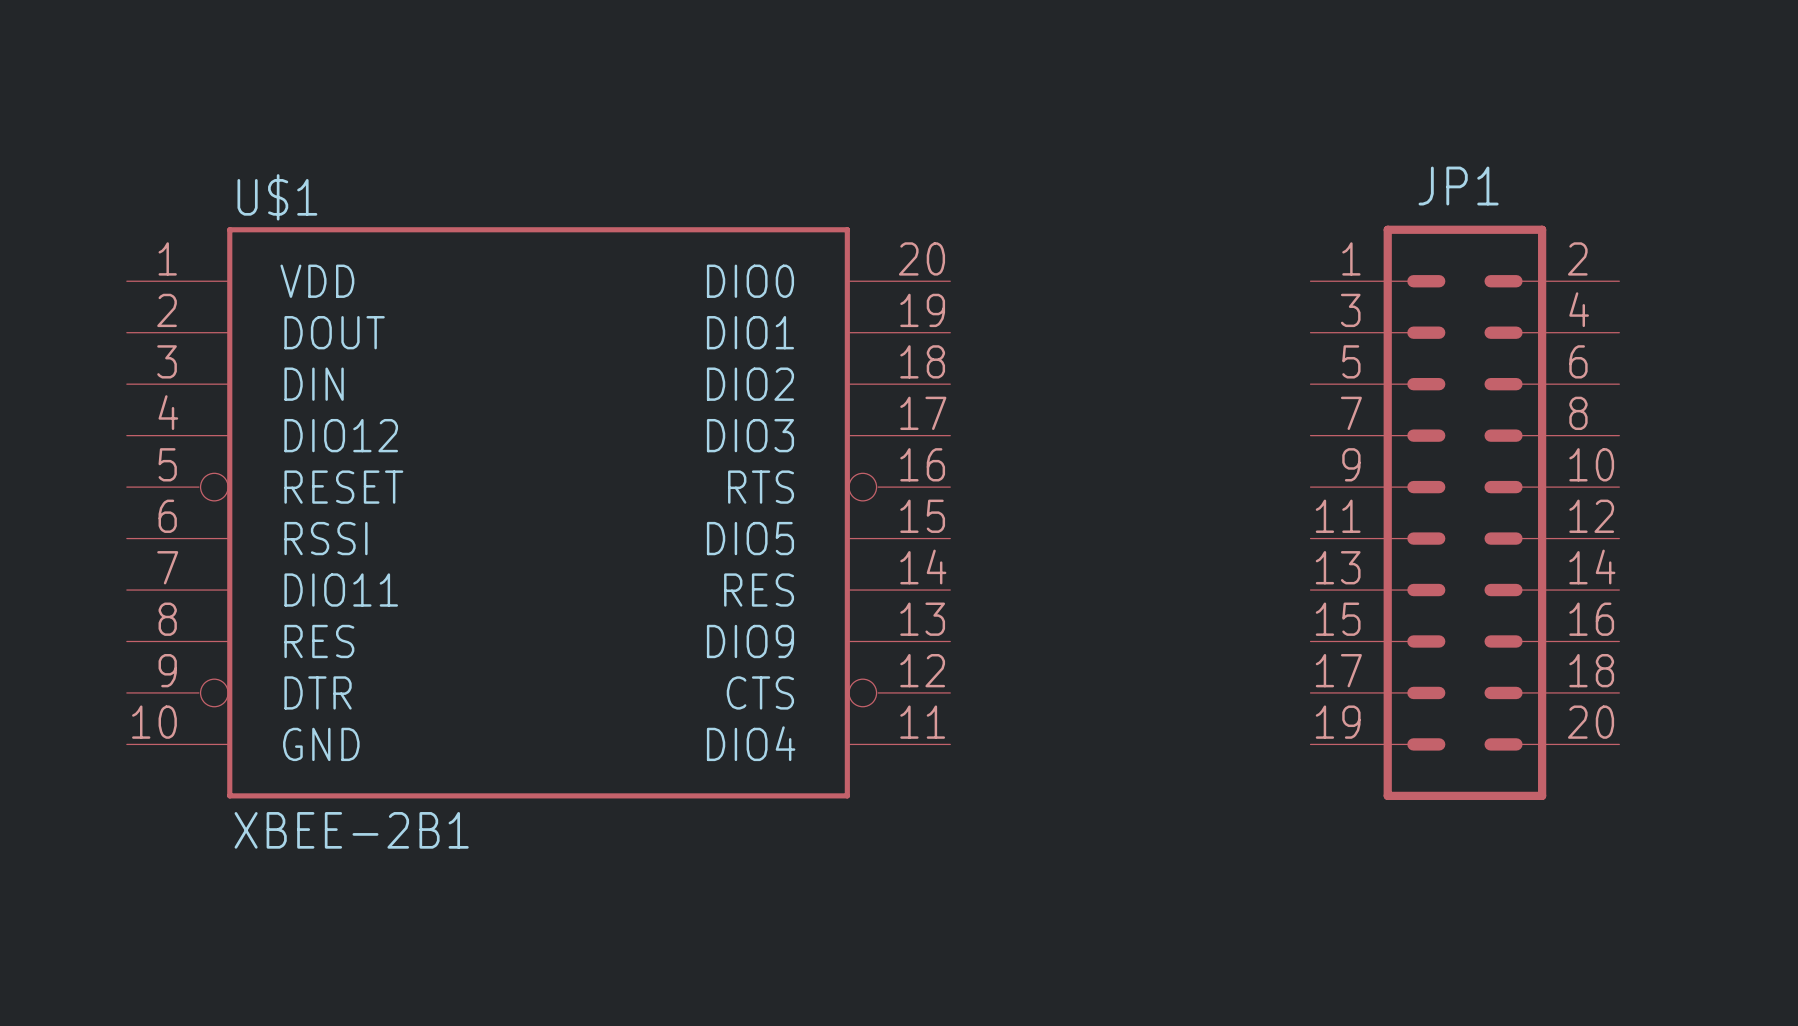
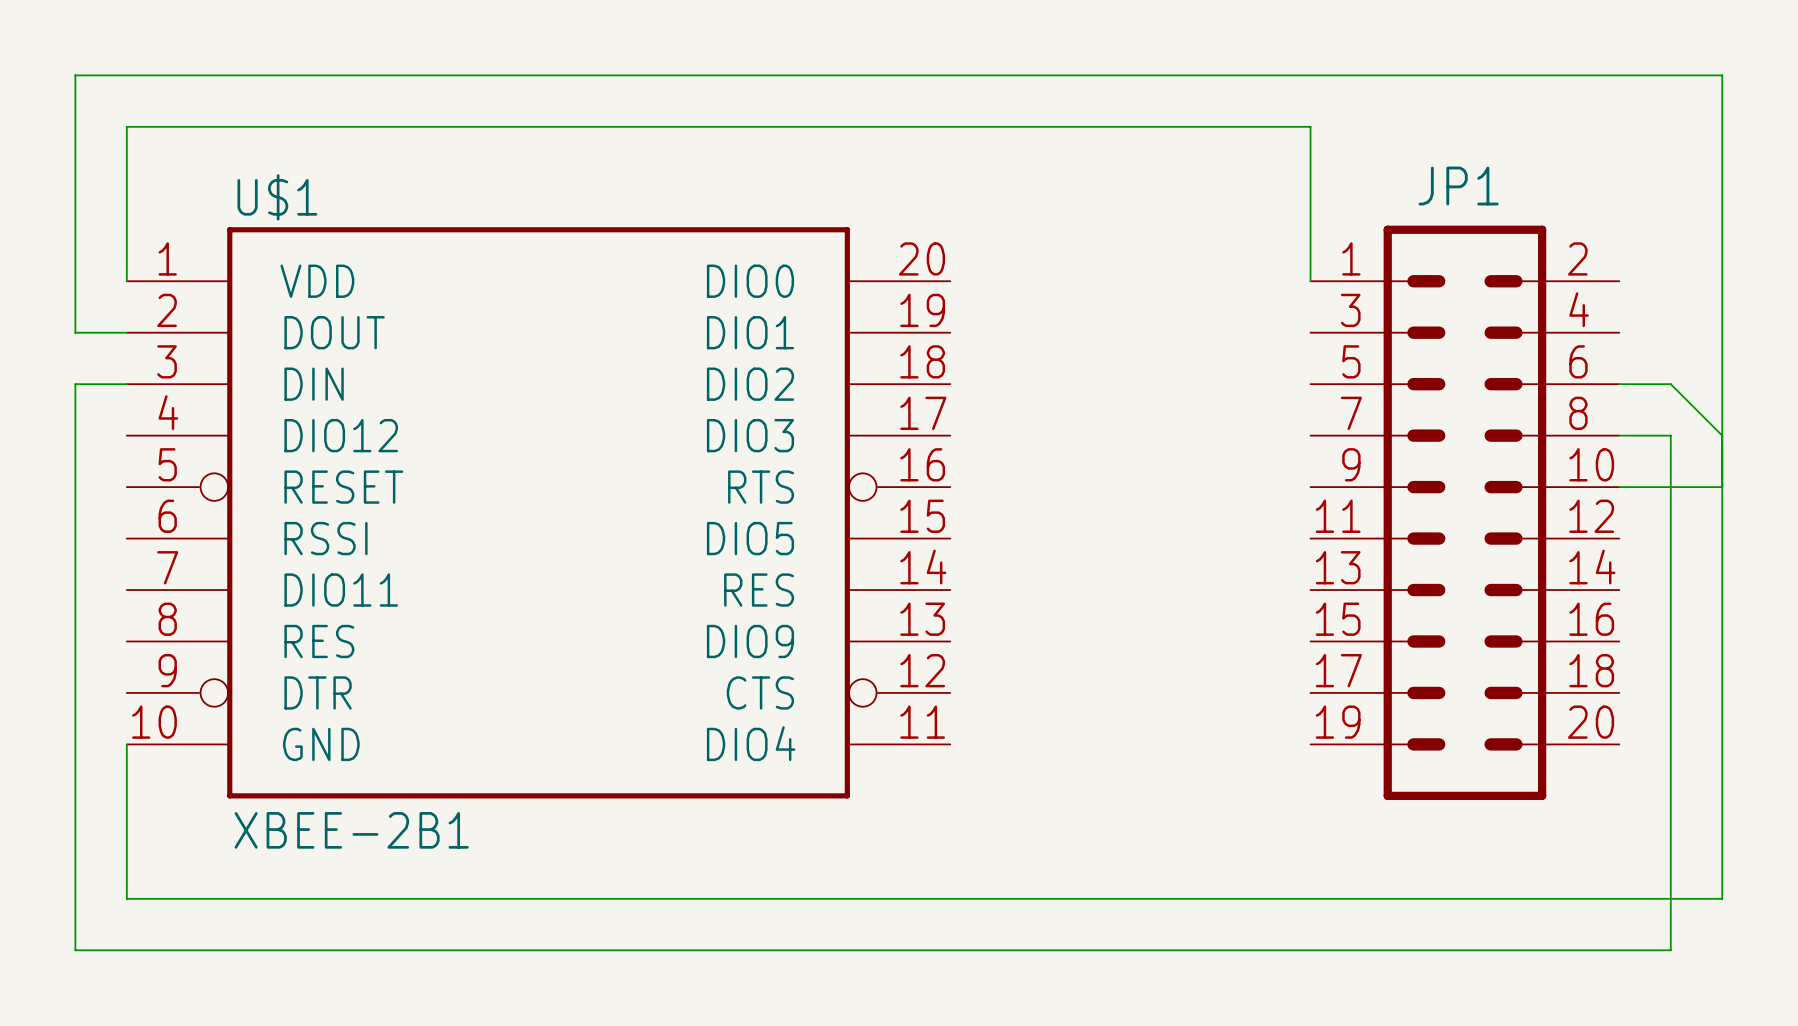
wire: none -> (126, 281) (126, 126) (1310, 126) (1310, 281)
wire: none -> (126, 332) (75, 332) (75, 75) (1722, 75) (1722, 898) (126, 898) (126, 744)
wire: none -> (126, 384) (75, 384) (75, 950) (1670, 950) (1670, 435) (1619, 435)
wire: none -> (1619, 384) (1670, 384) (1722, 435)
wire: none -> (1619, 487) (1722, 487)

